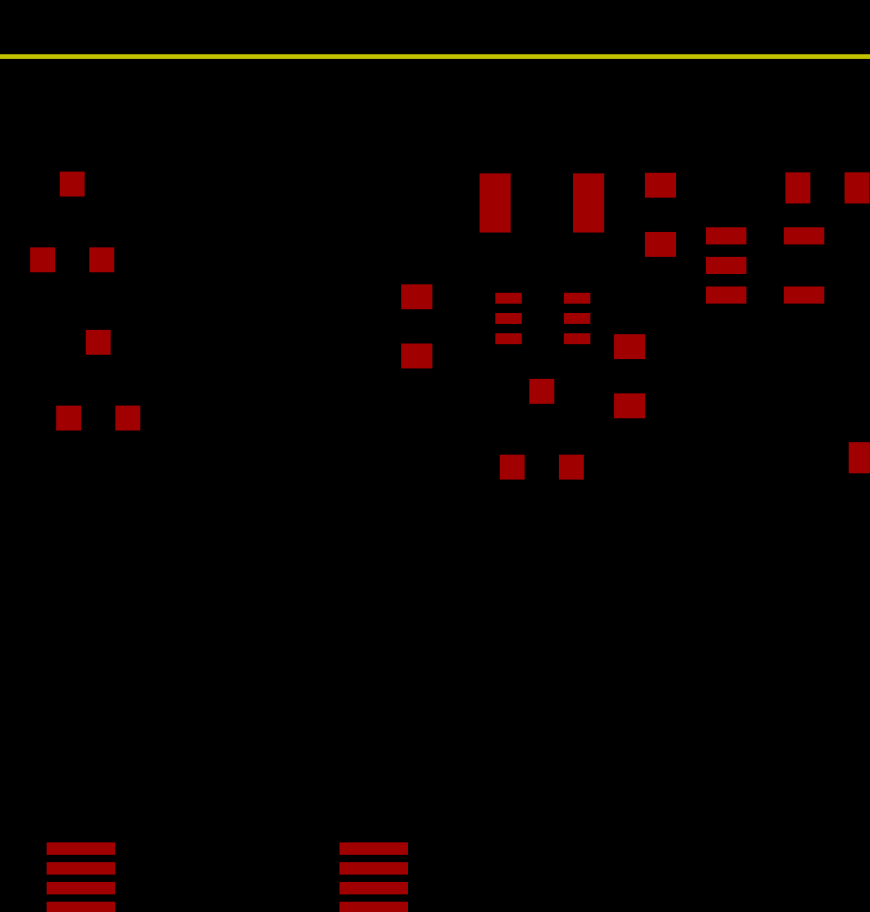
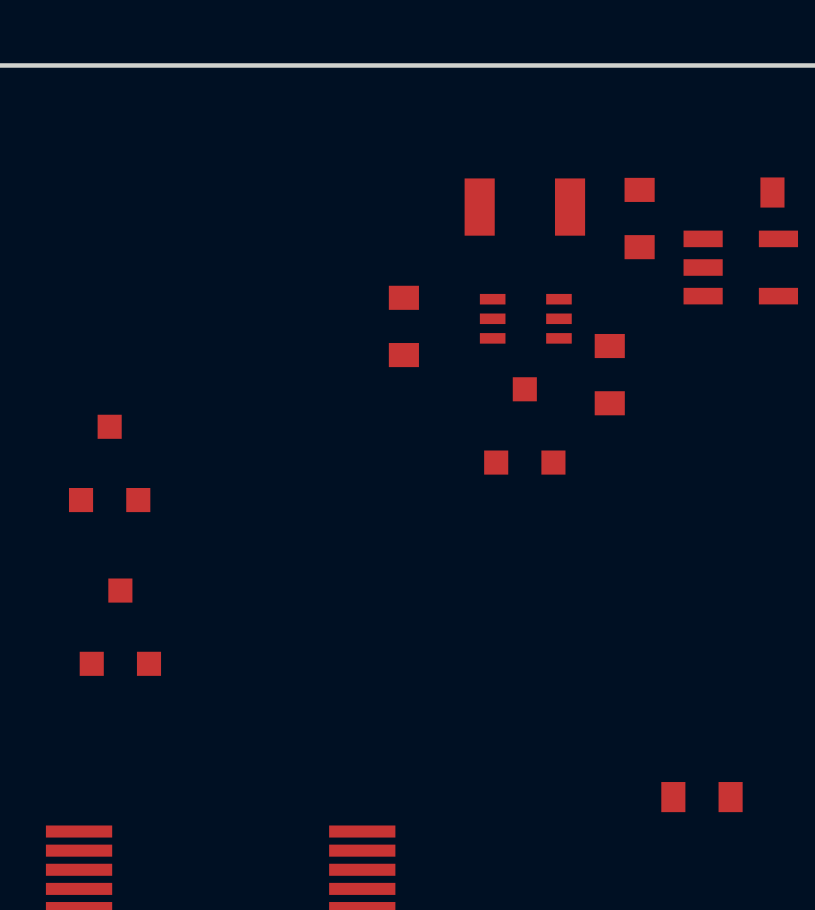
part: (72, 221) -> none
part position: (98, 380) -> (109, 463)
part: none -> (120, 627)
part: none -> (701, 797)

